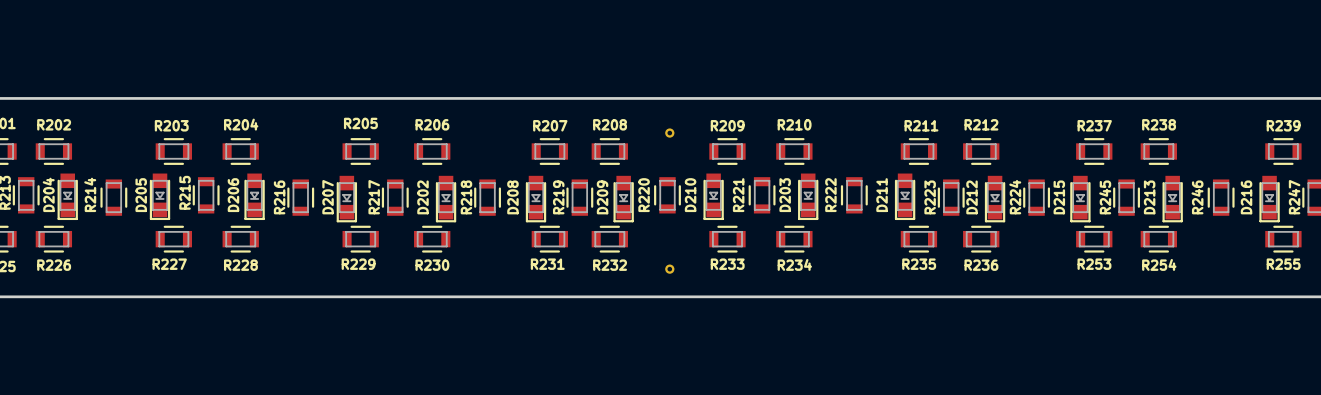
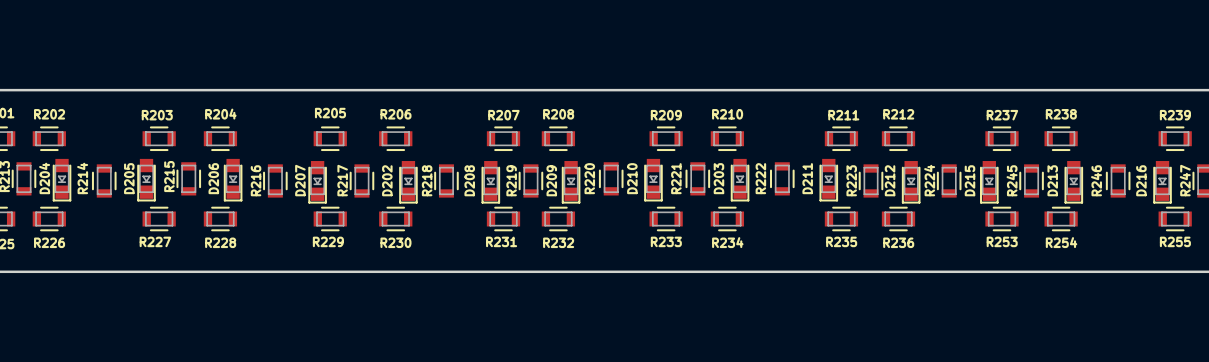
part: (669, 133) -> none
part: (669, 269) -> none

